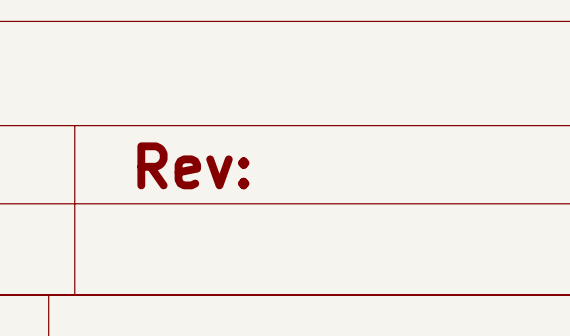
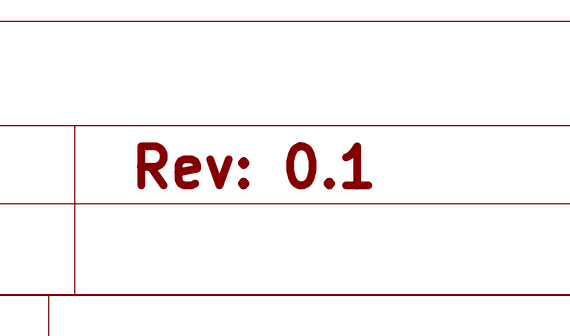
title block: Rev: (193, 165) -> Rev: 0.1 (254, 165)

